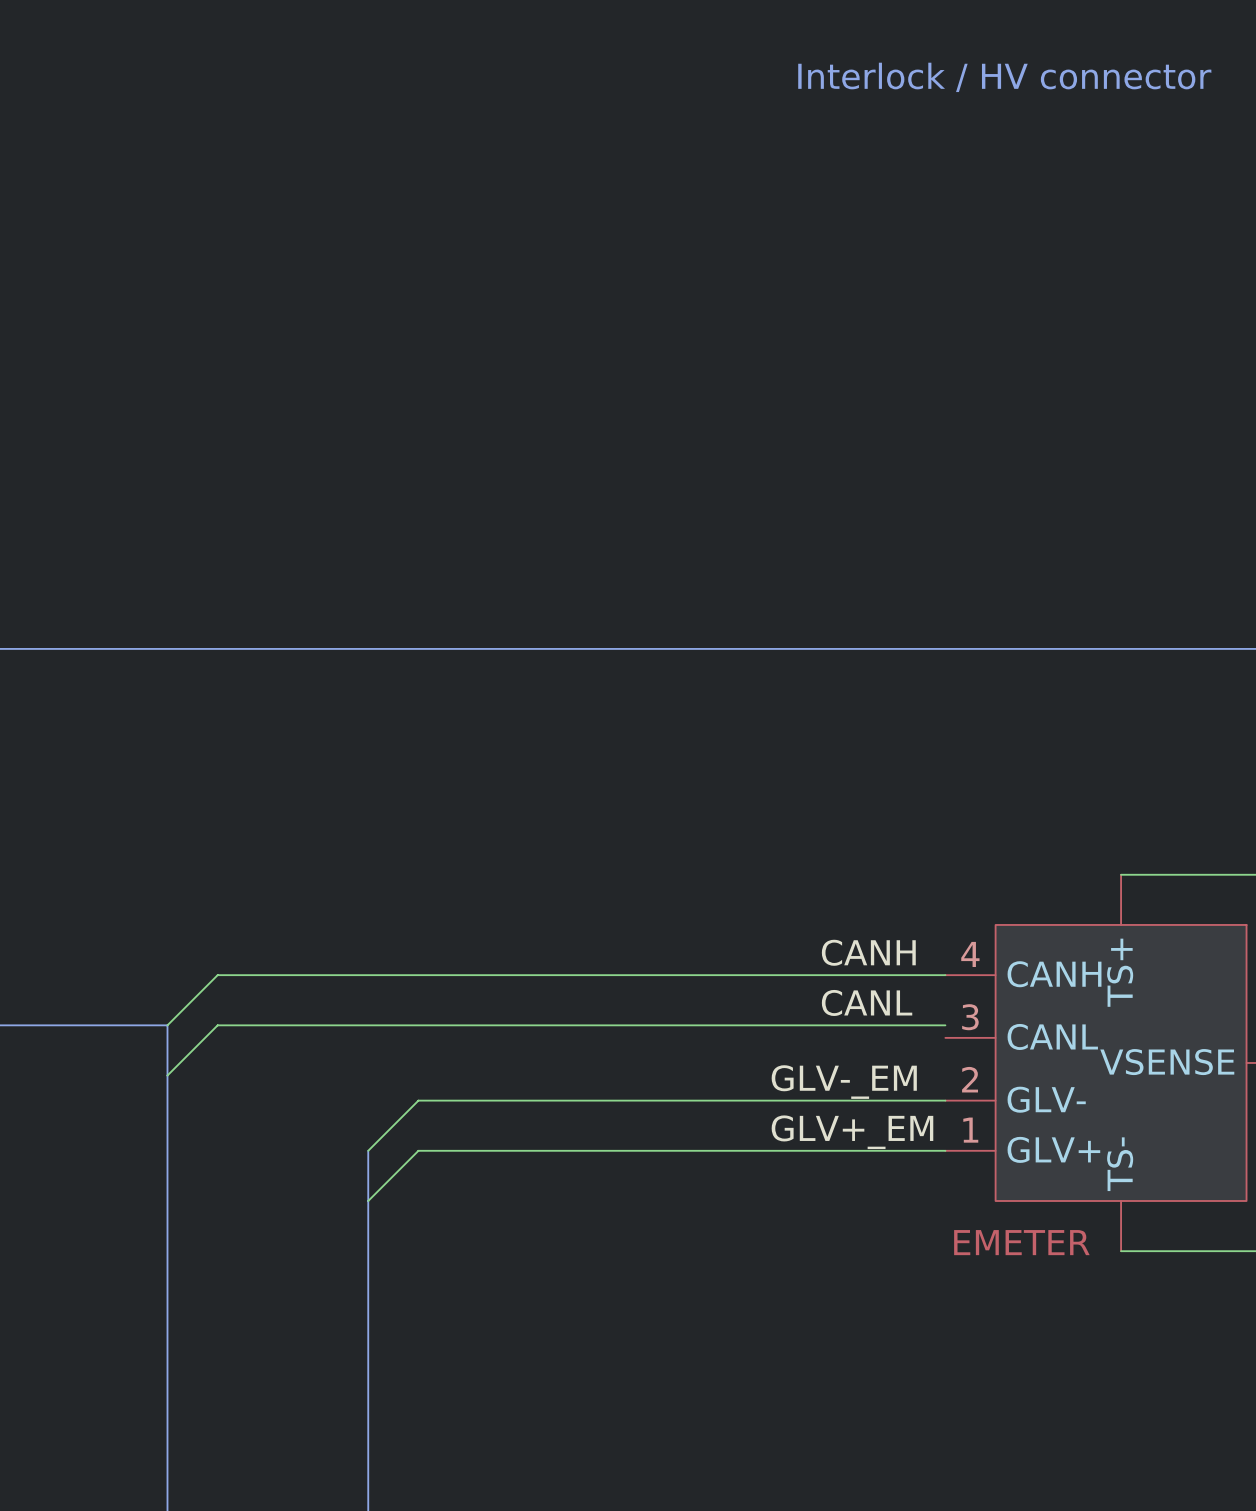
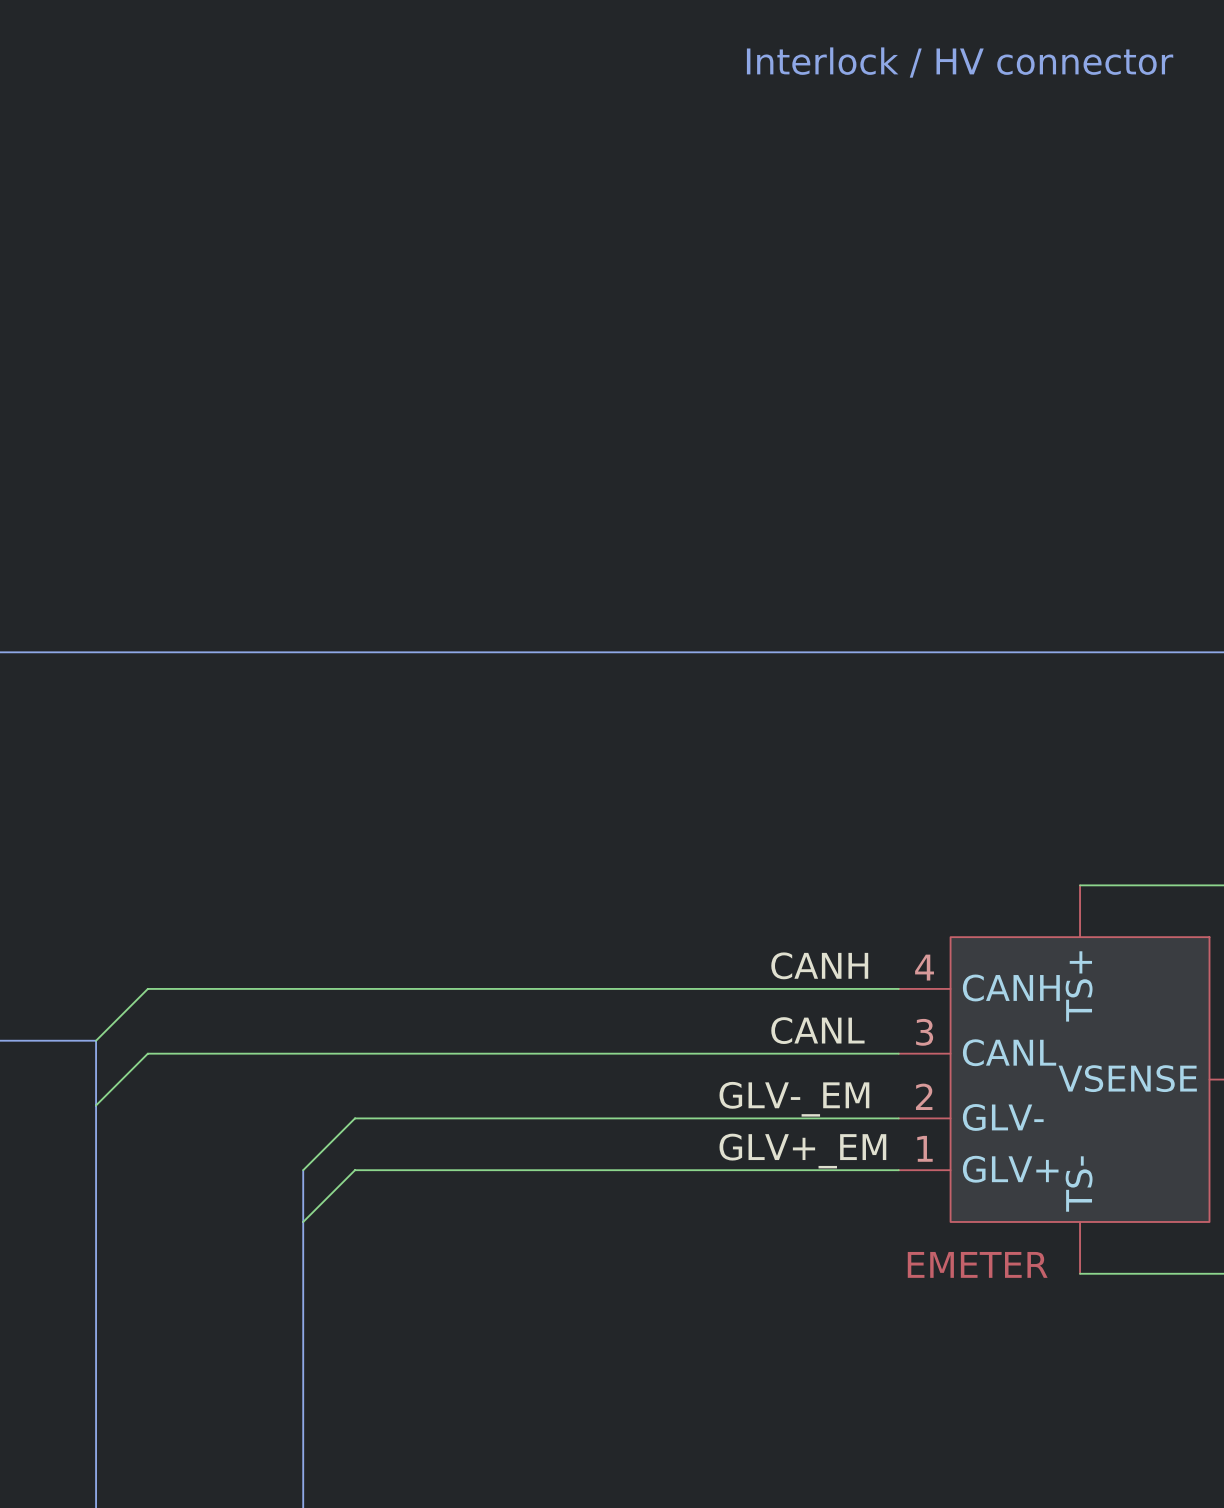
label position: CANL (867, 1002) -> CANL (817, 1030)
wire: (945, 1025) (217, 1025) (167, 1075) -> (898, 1053) (147, 1053) (96, 1105)

